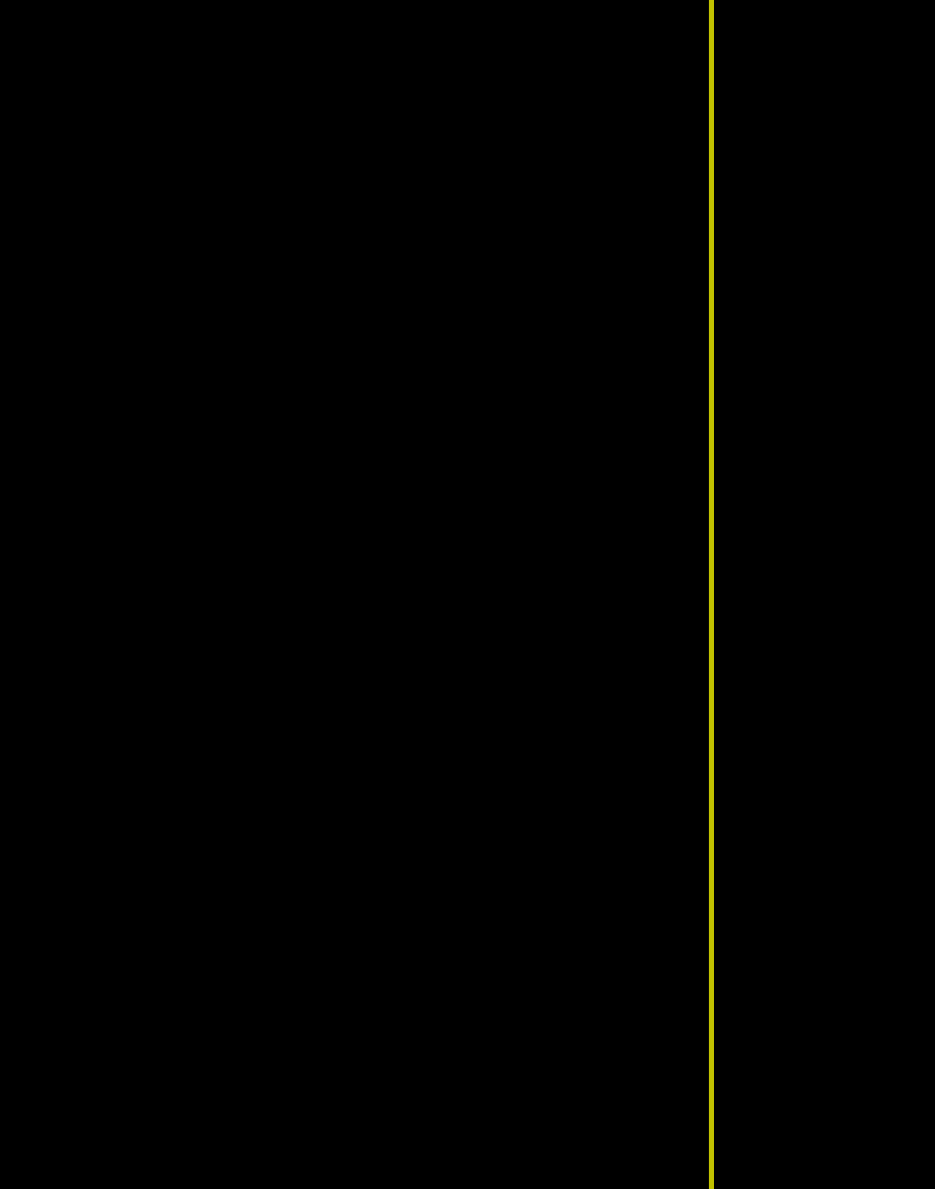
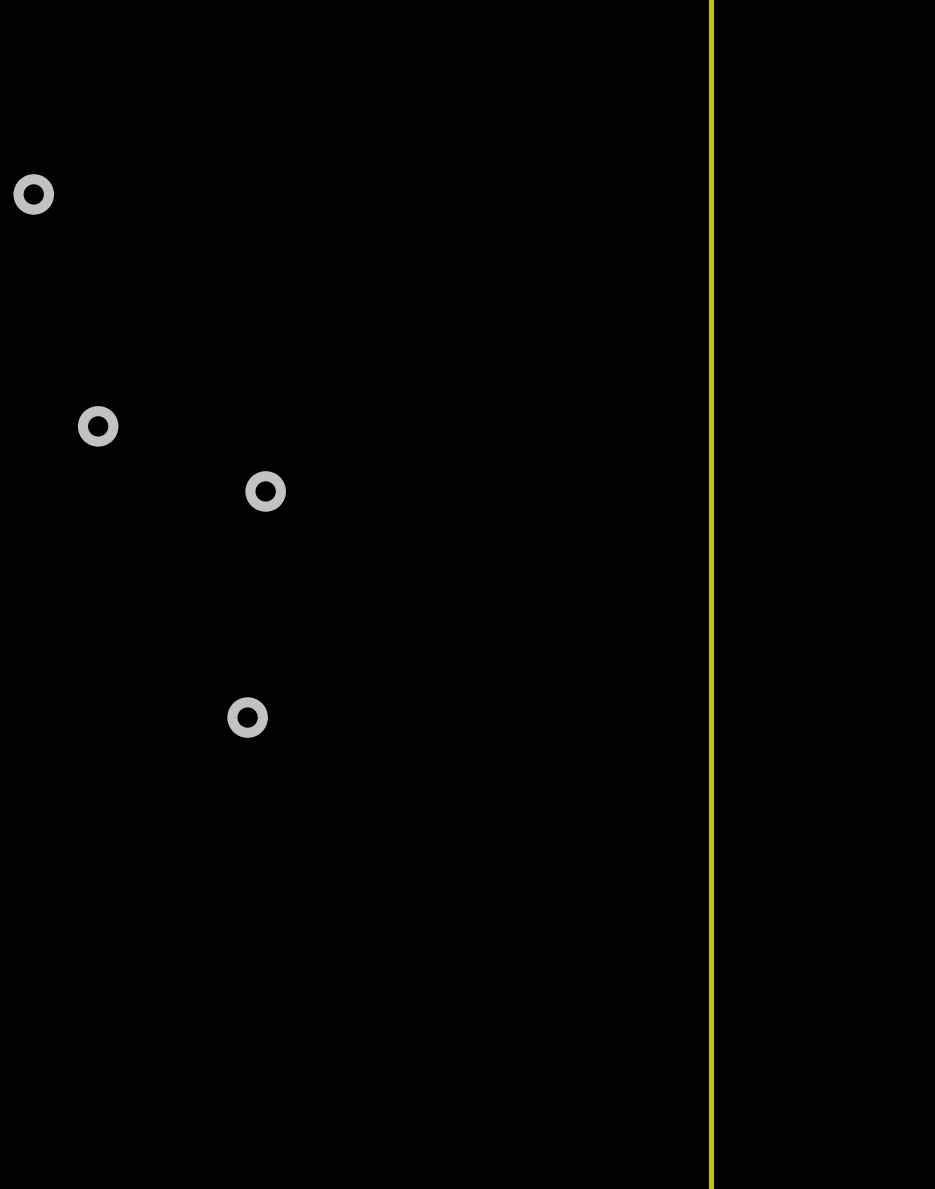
via: none -> (33, 194)
via: none -> (98, 426)
via: none -> (265, 491)
via: none -> (247, 717)

